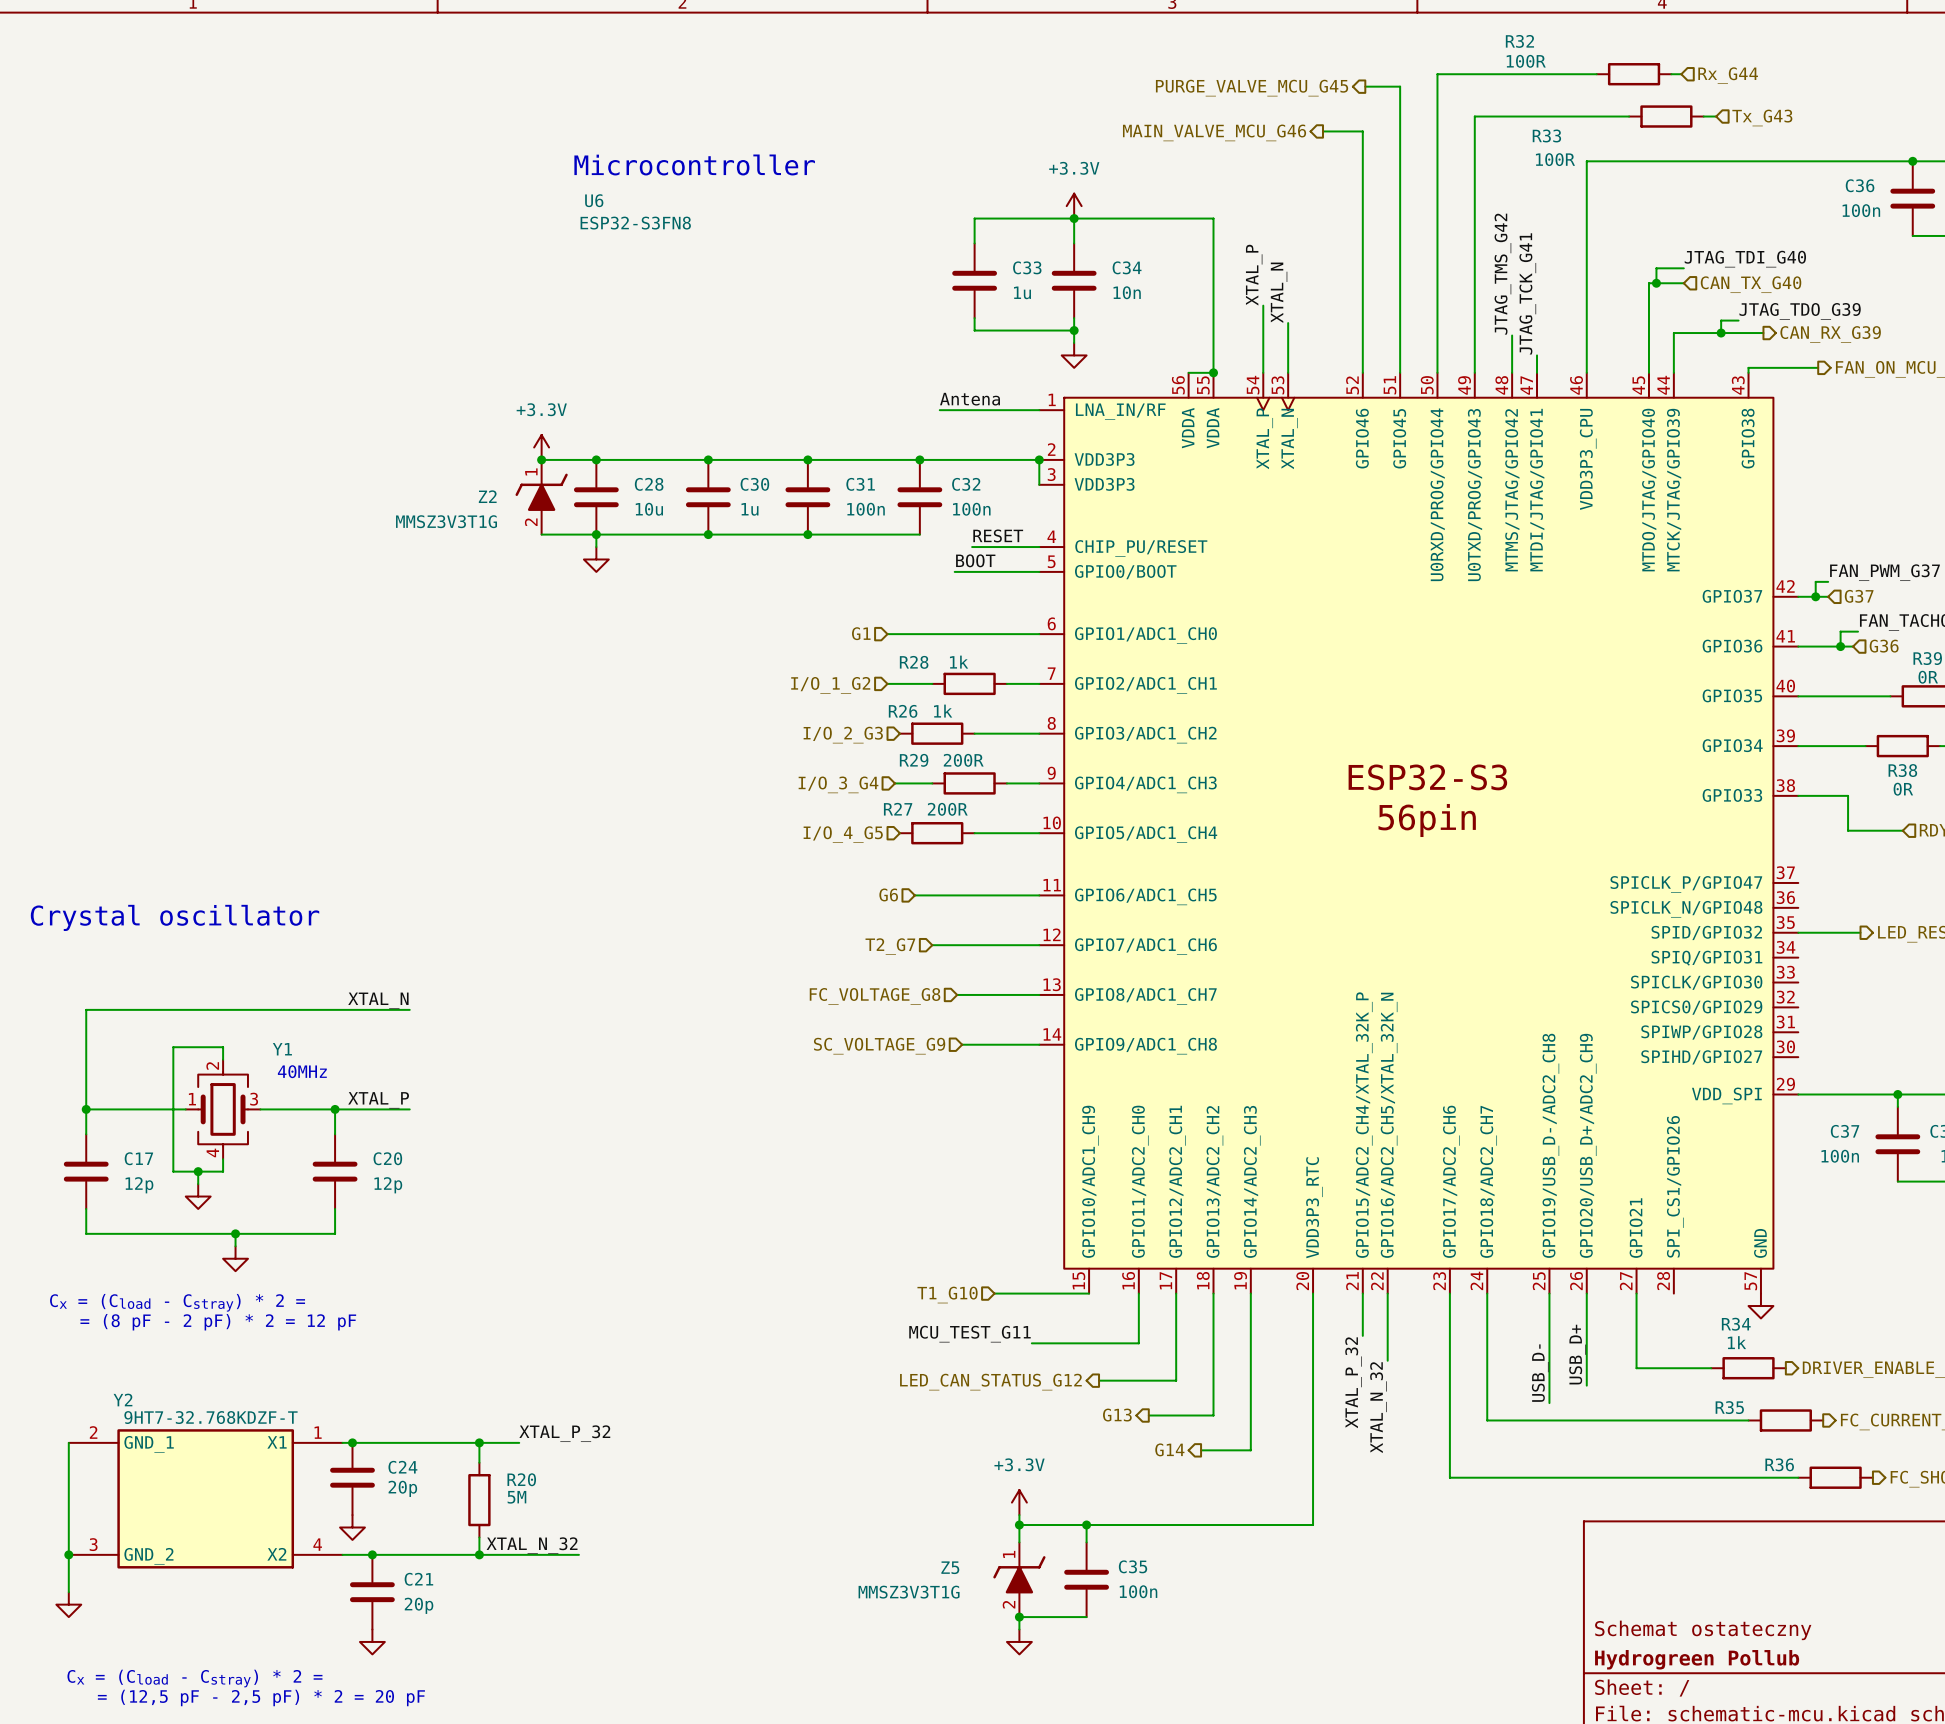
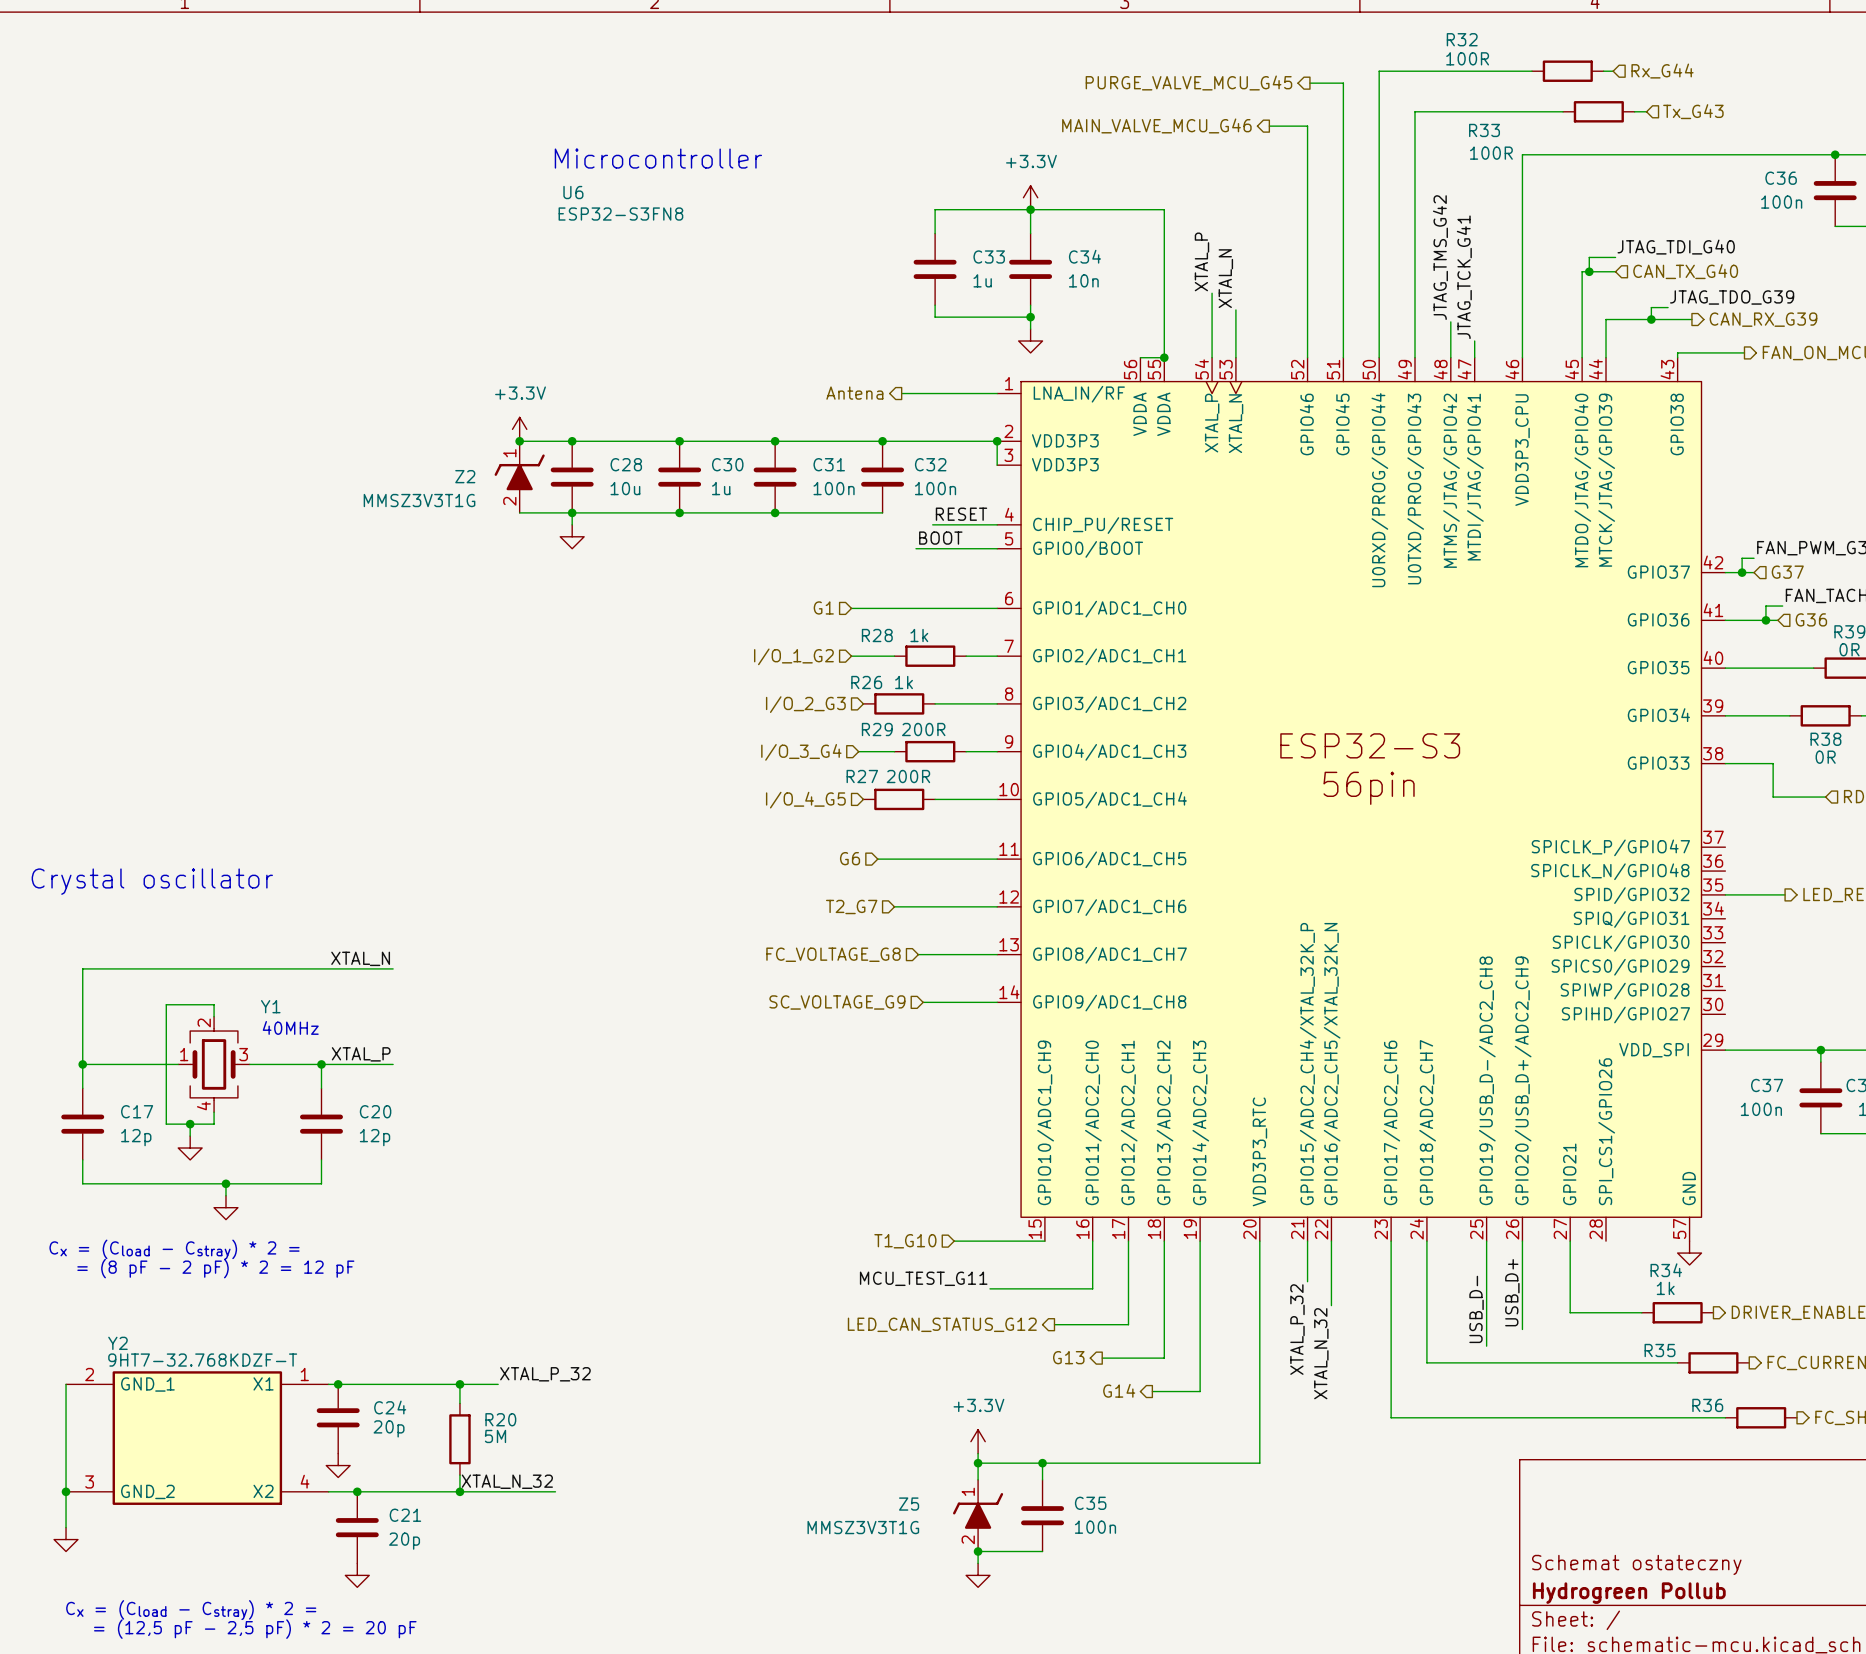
label: Antena (970, 399) -> none
hierarchical label: none -> Antena (854, 393)

